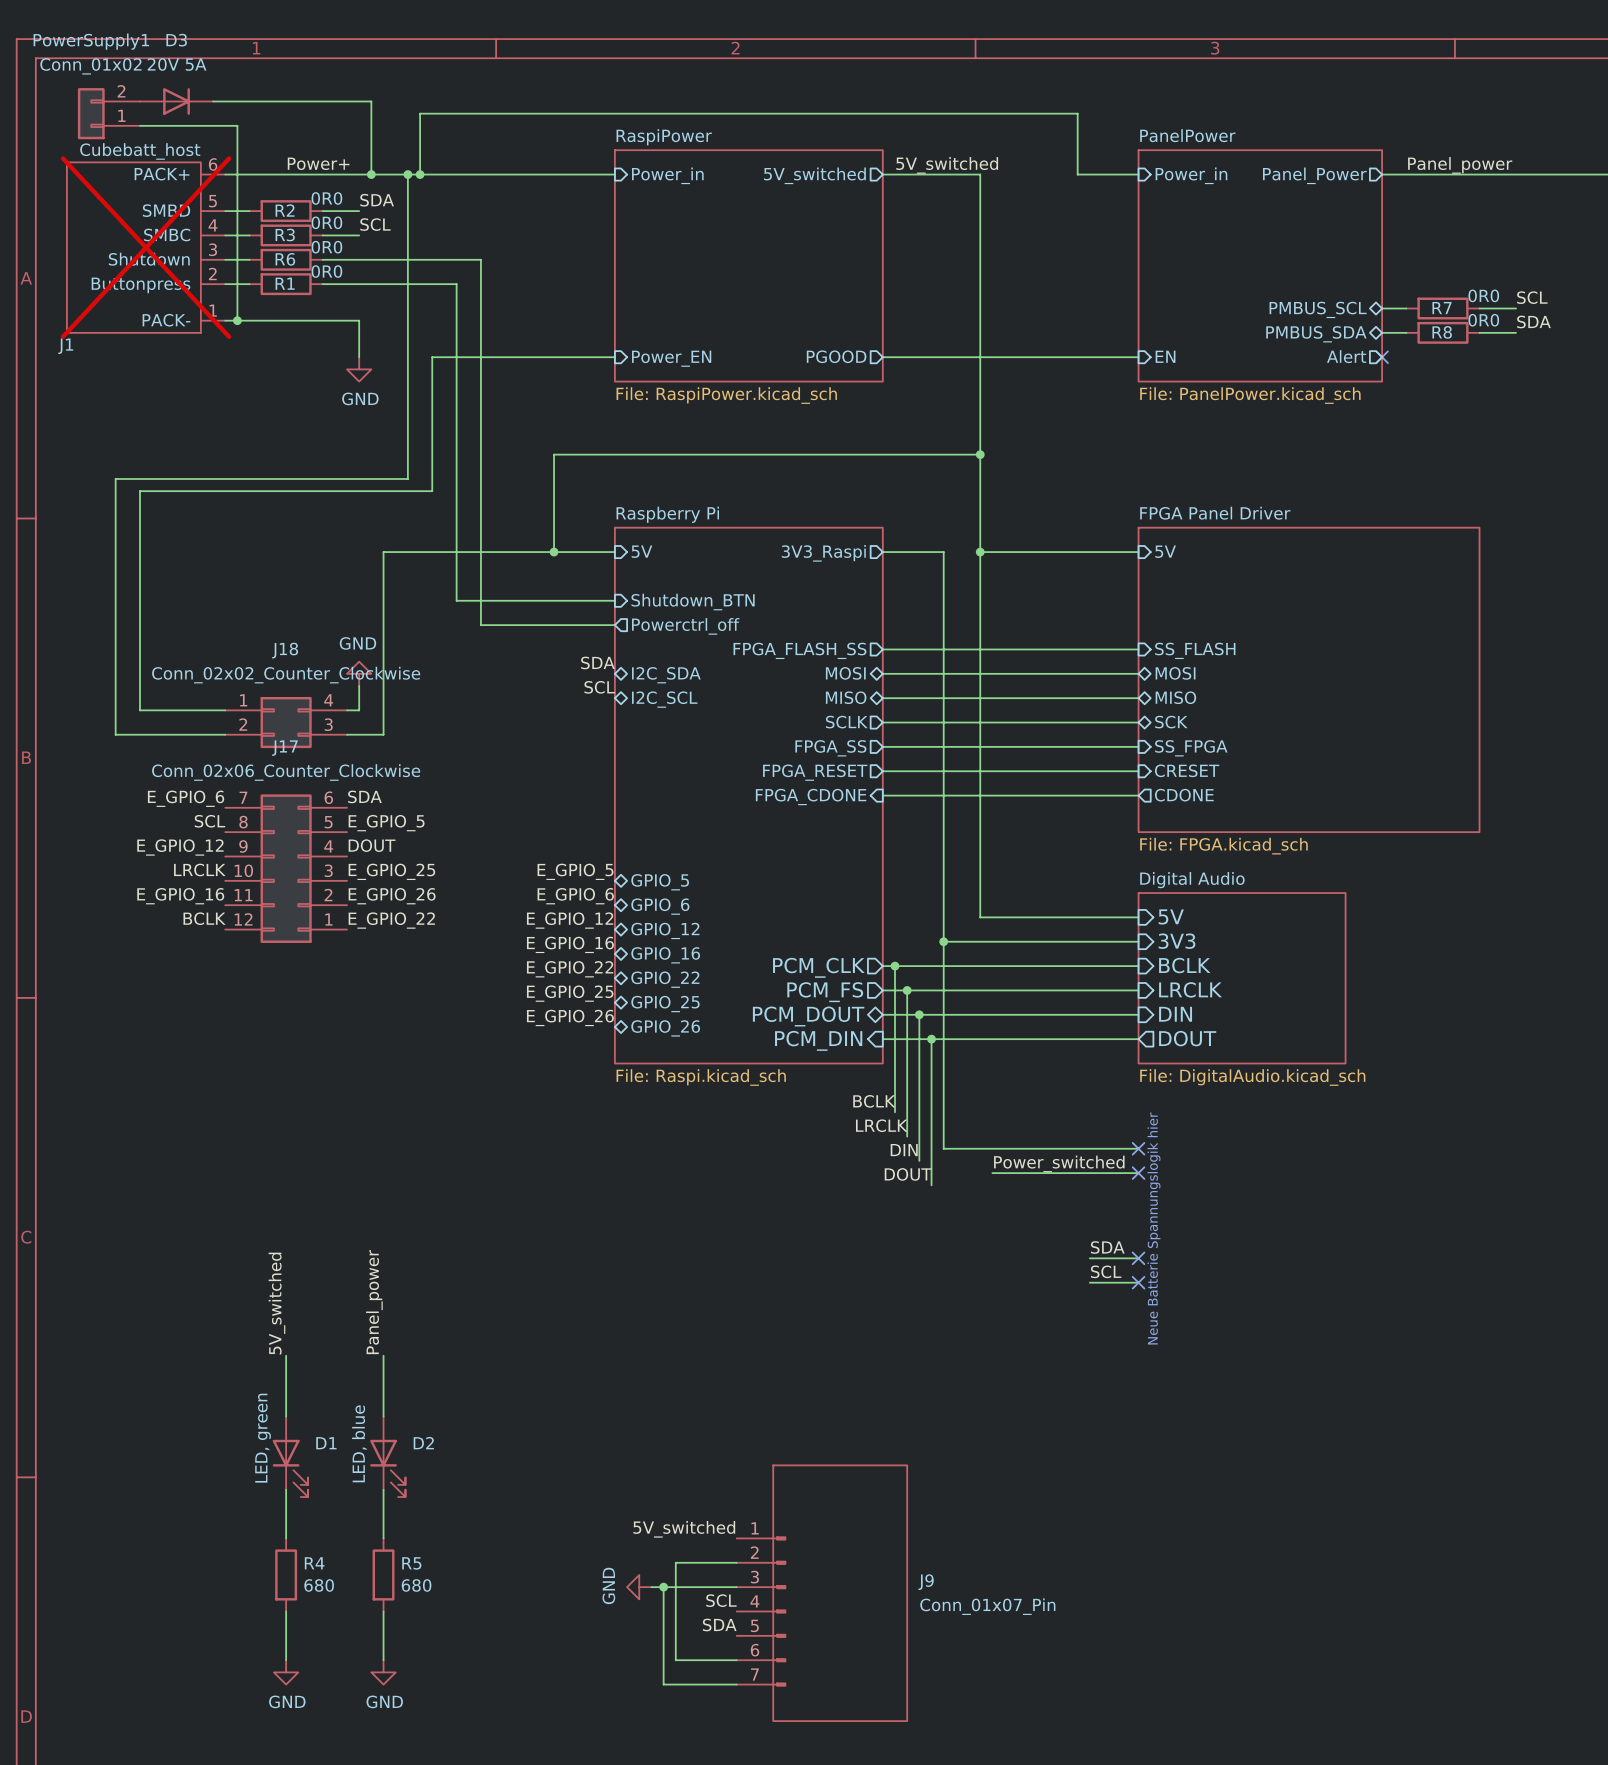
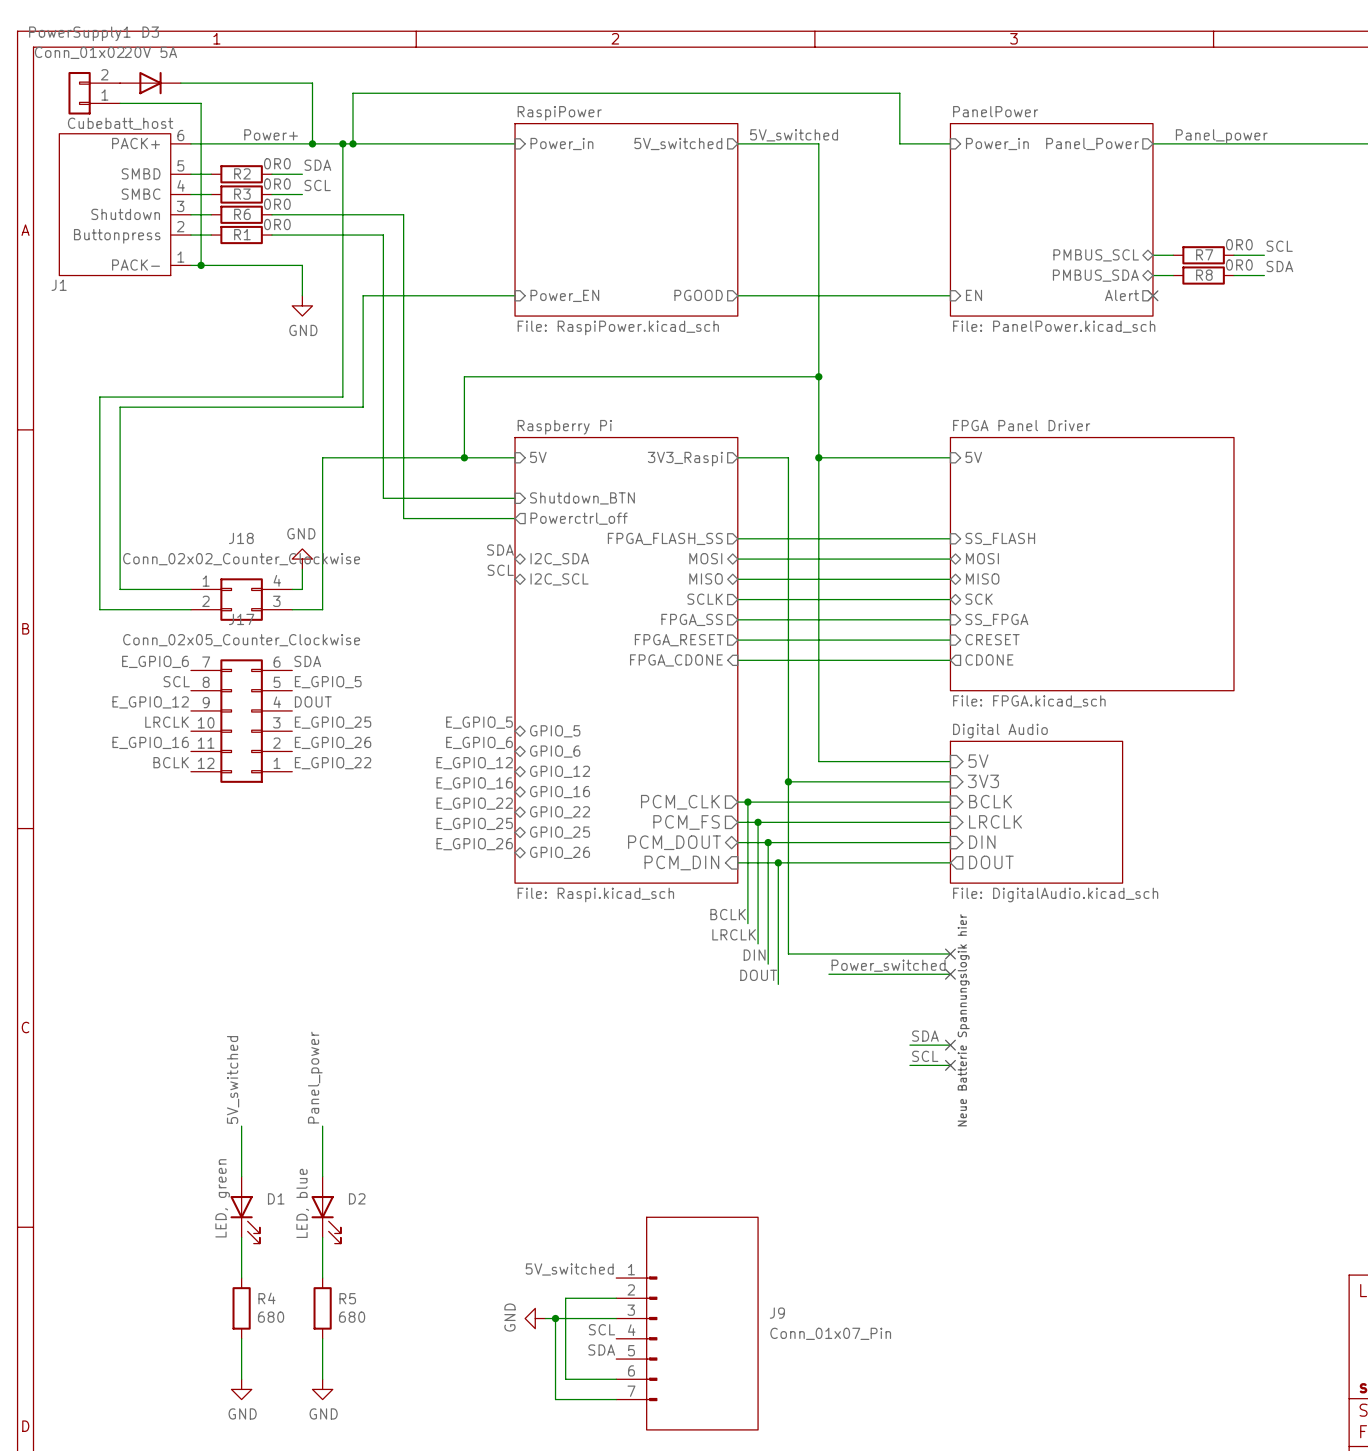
J1 do-not-place cross: (146, 247) -> none
J17 value: Conn_02x06_Counter_Clockwise (286, 772) -> Conn_02x05_Counter_Clockwise (241, 640)

